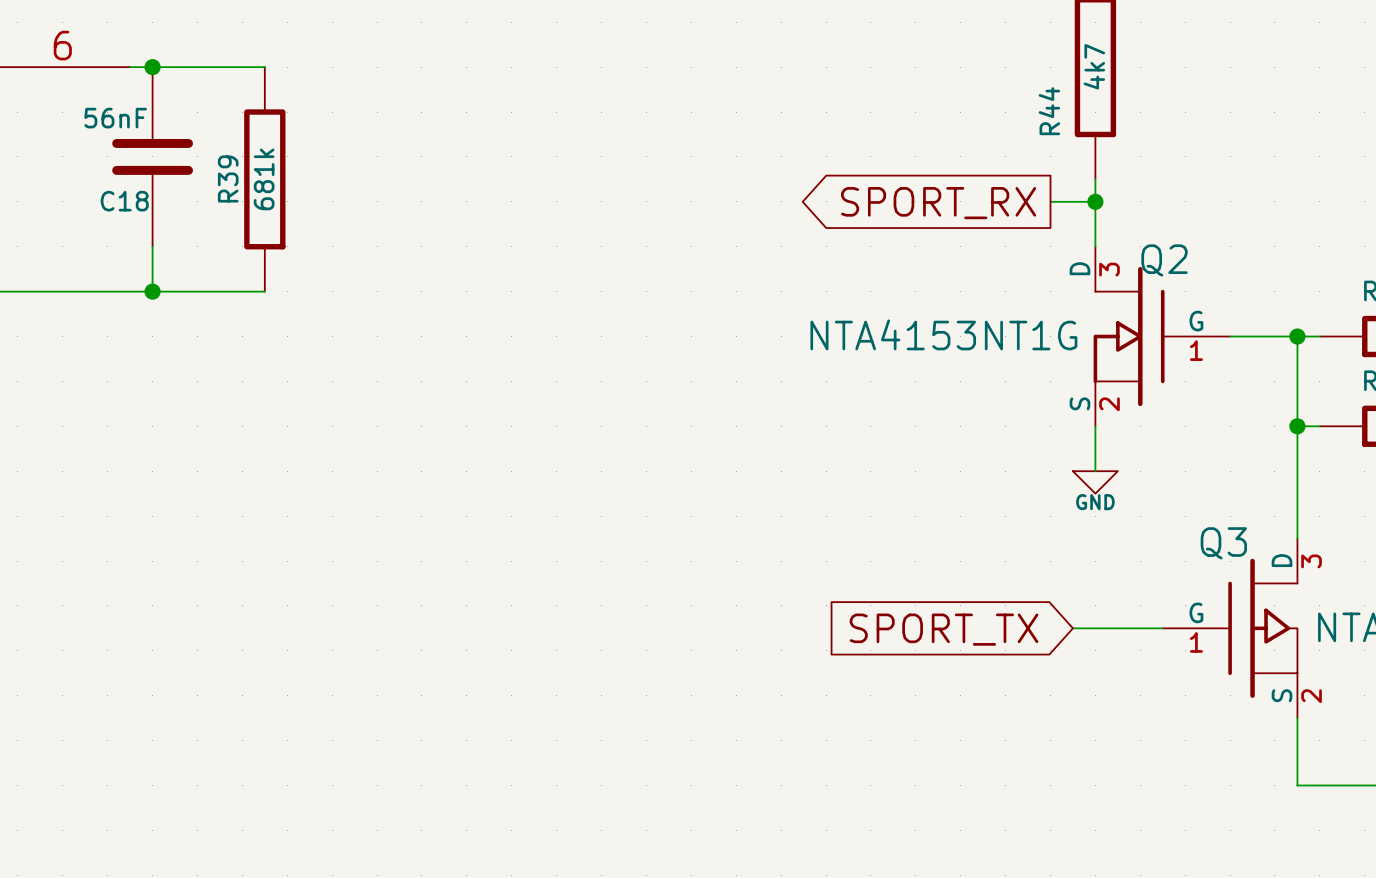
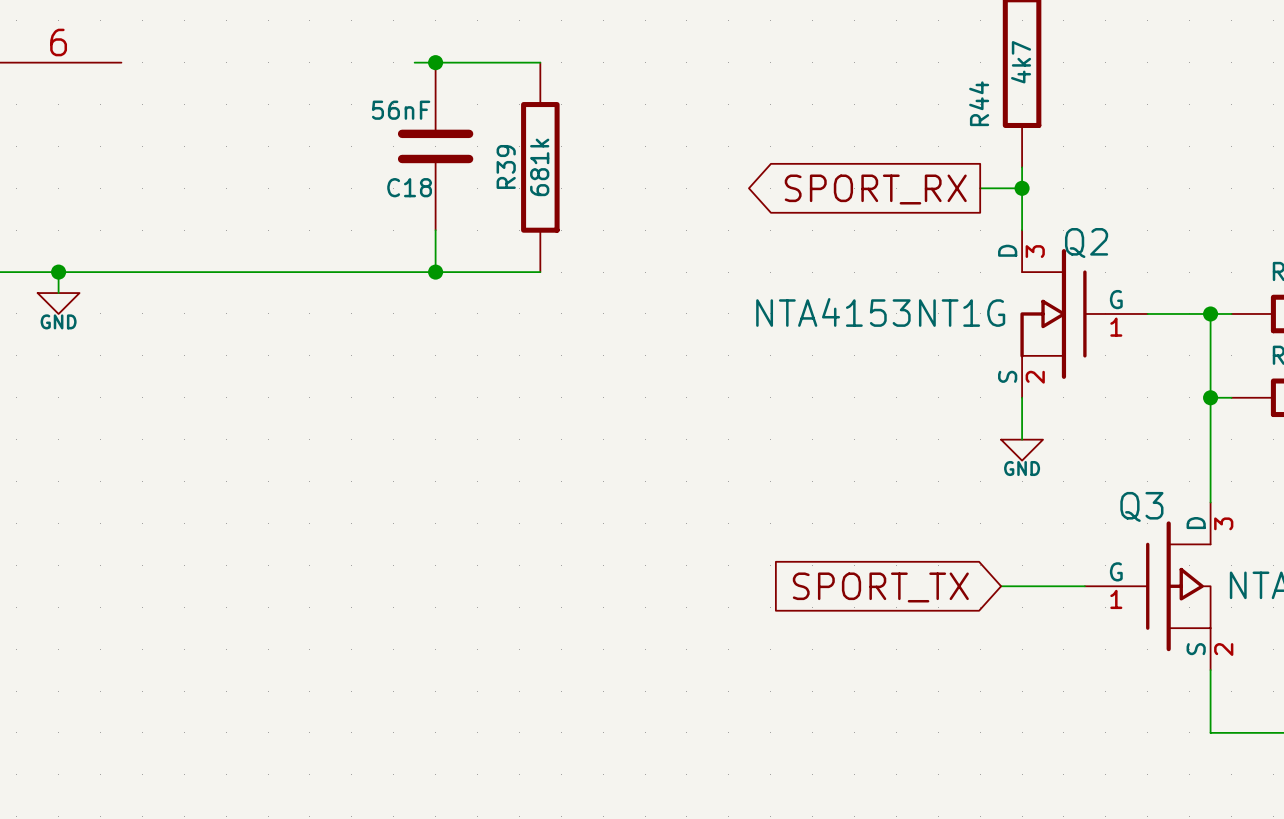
wire: (130, 67) (264, 67) -> (414, 62) (540, 62)
junction: (152, 67) -> none
junction: none -> (435, 62)
C18 position: (152, 156) -> (435, 146)
R39 position: (264, 179) -> (540, 167)
wire: (152, 246) (152, 291) -> (435, 230) (435, 272)
wire: none -> (58, 272) (58, 293)
junction position: (152, 291) -> (58, 272)
wire: none -> (247, 272) (540, 272)
junction: none -> (435, 272)
power symbol: none -> GND (58, 303)

